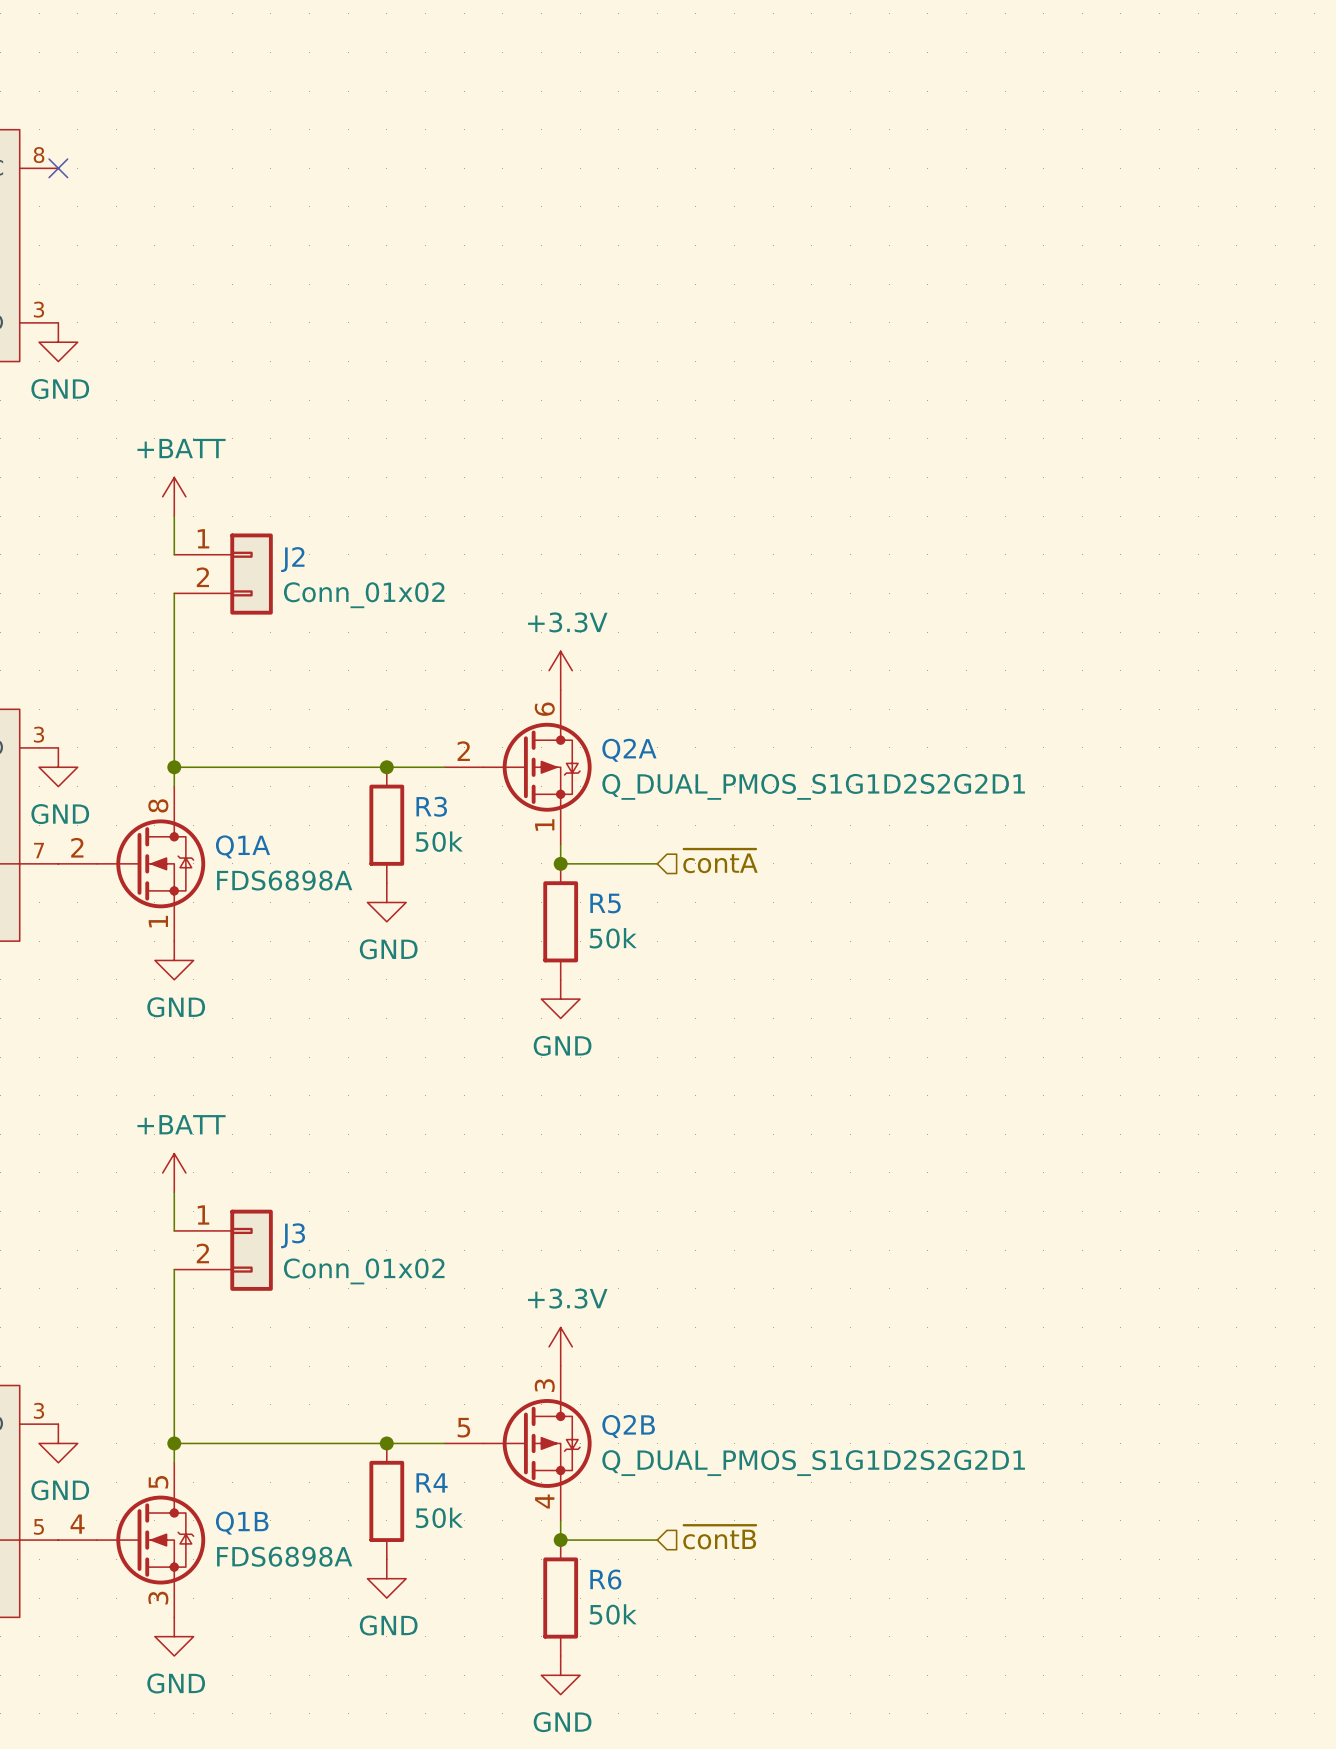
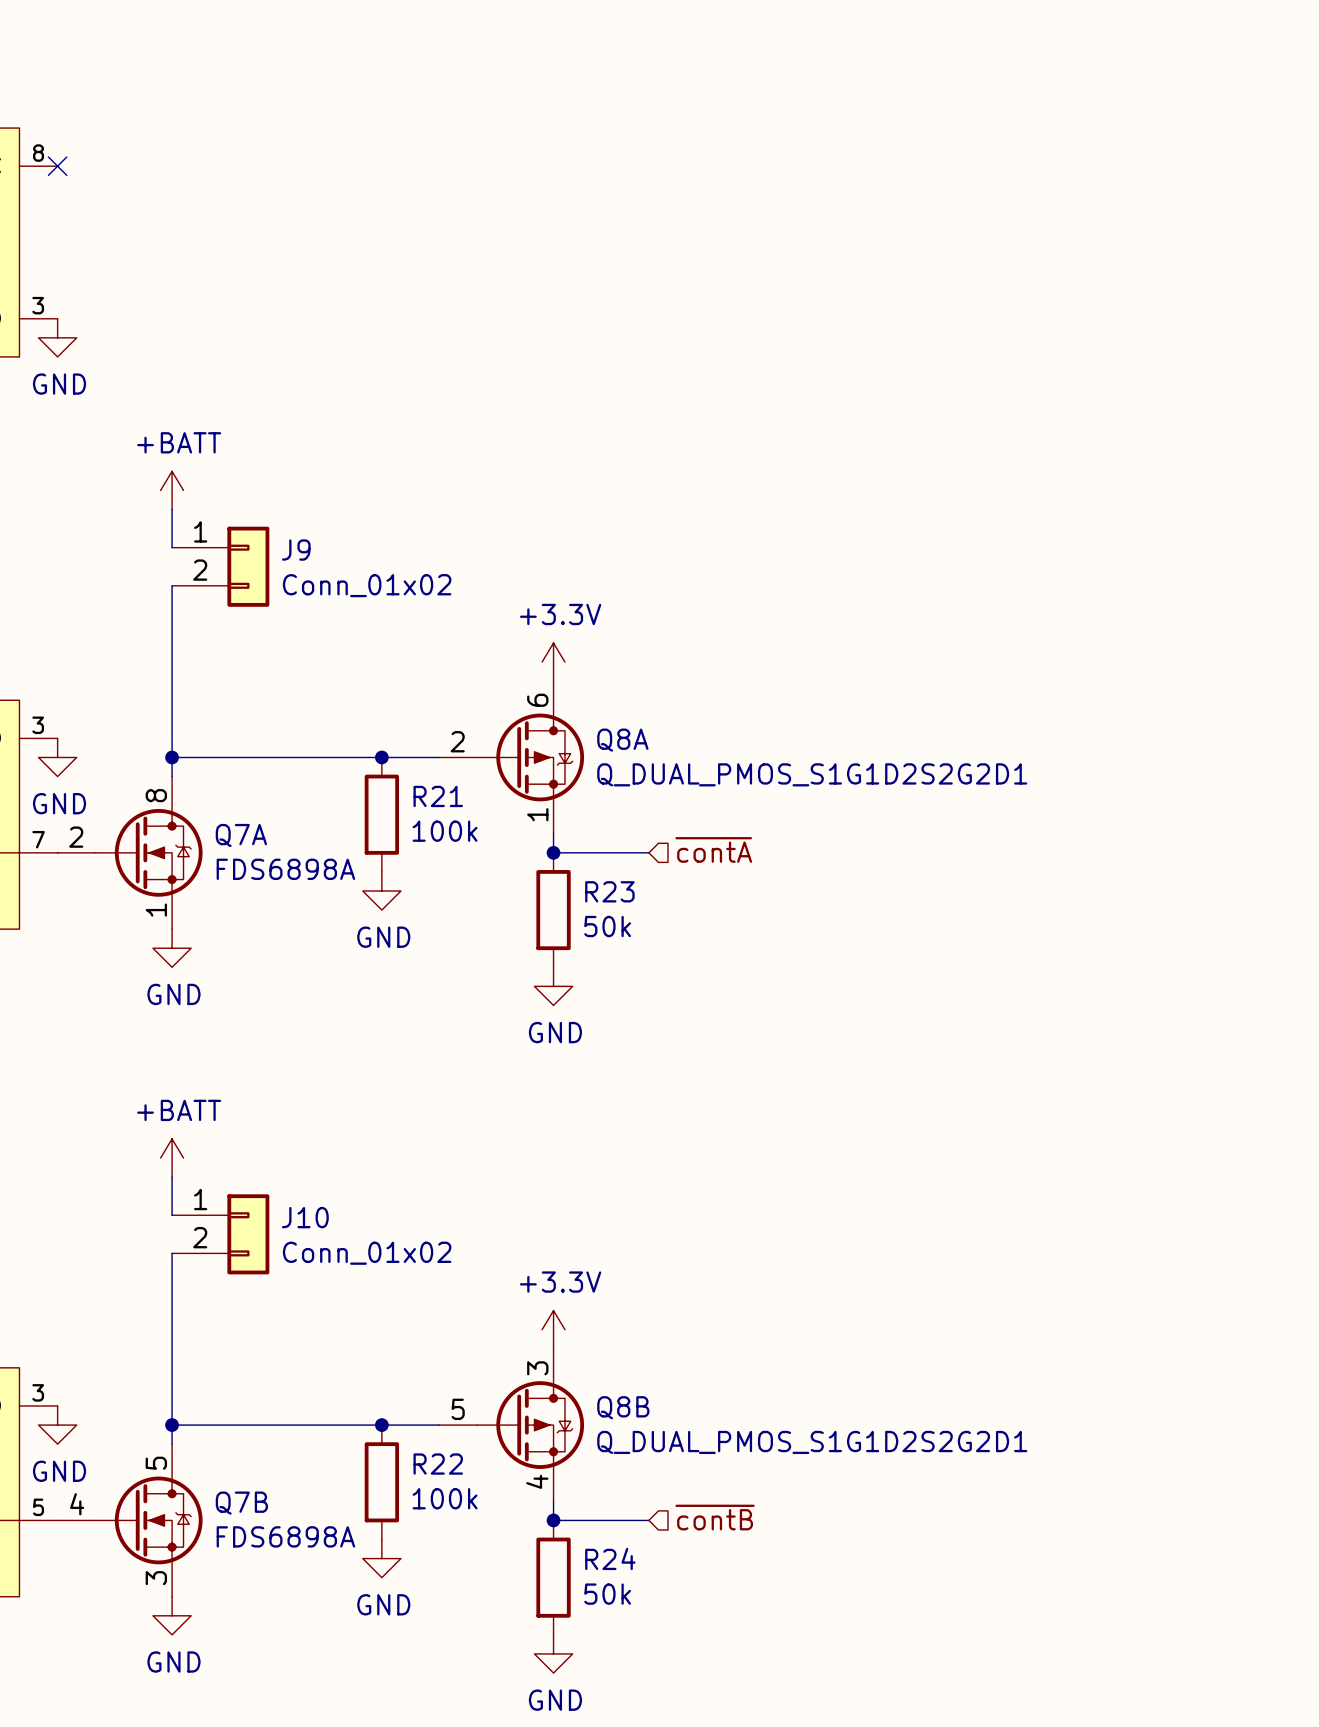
J2 name: J2 (292, 559) -> J9 (296, 550)
Q2A name: Q2A (629, 750) -> Q8A (622, 740)
R3 name: R3 (431, 806) -> R21 (438, 796)
R3 value: 50k (439, 841) -> 100k (445, 831)
Q1A name: Q1A (243, 846) -> Q7A (241, 835)
R5 name: R5 (605, 903) -> R23 (609, 891)
J3 name: J3 (293, 1235) -> J10 (305, 1217)
Q2B name: Q2B (628, 1426) -> Q8B (623, 1407)
R4 name: R4 (432, 1482) -> R22 (438, 1464)
R4 value: 50k (439, 1517) -> 100k (445, 1498)
Q1B name: Q1B (242, 1523) -> Q7B (241, 1503)
R6 name: R6 (605, 1579) -> R24 (610, 1558)

